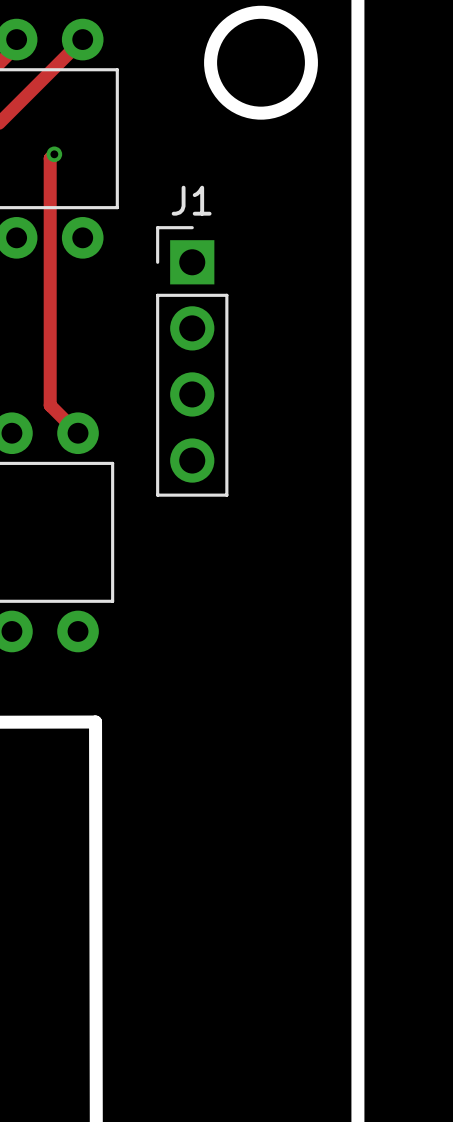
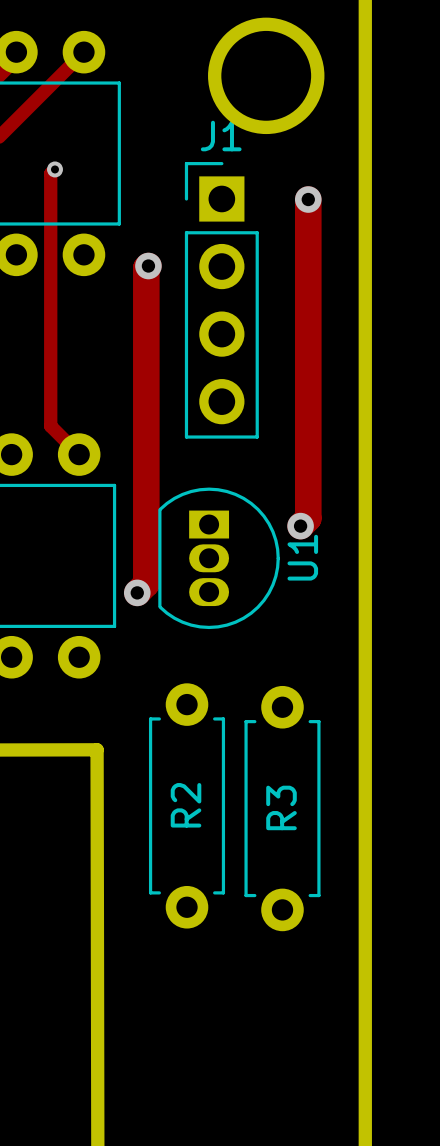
track: none -> (308, 199) (308, 518) (300, 526)
via: none -> (308, 199)
track: none -> (148, 266) (146, 268) (146, 583) (137, 592)
via: none -> (148, 266)
J1 position: (192, 361) -> (221, 300)
via: none -> (300, 526)
U1: none -> (219, 558)
via: none -> (137, 592)
R2: none -> (187, 805)
R3: none -> (282, 808)

